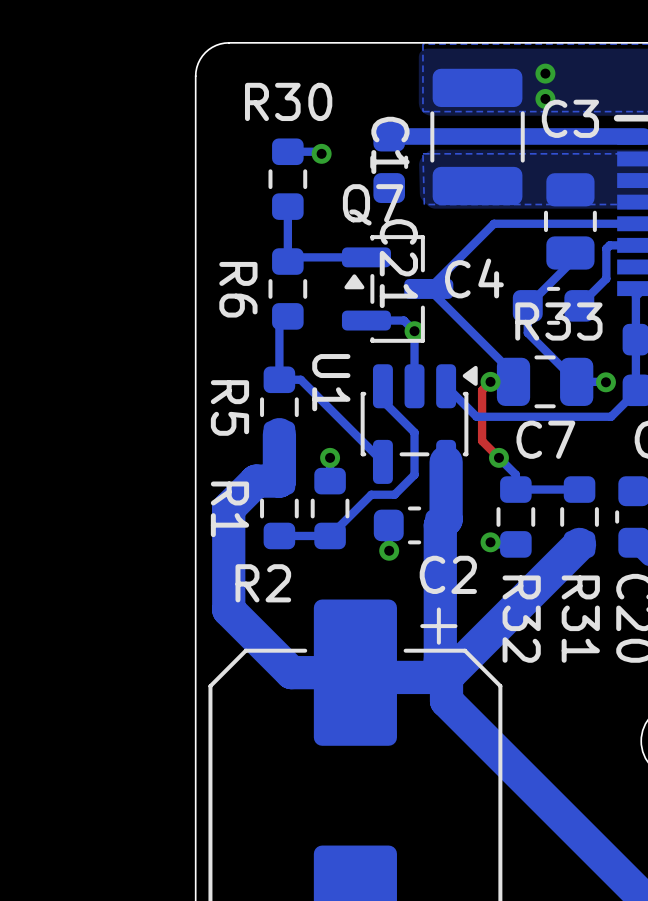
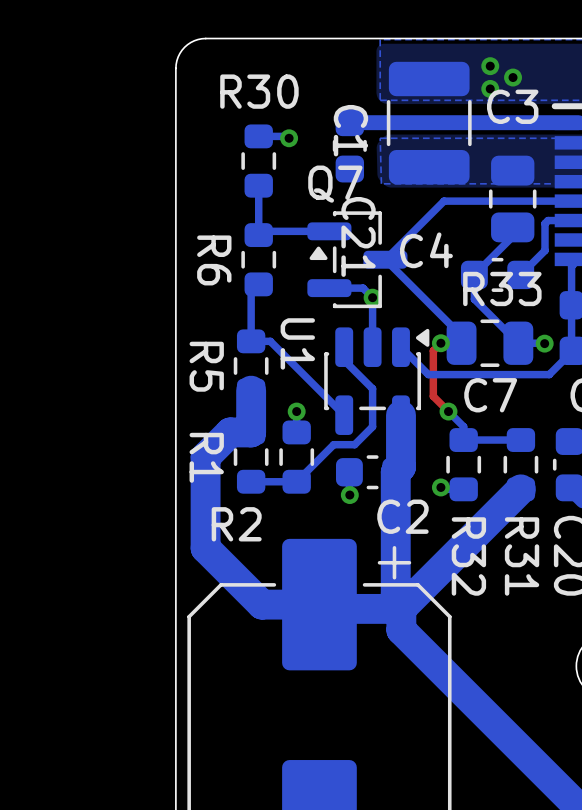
via: none -> (513, 77)

